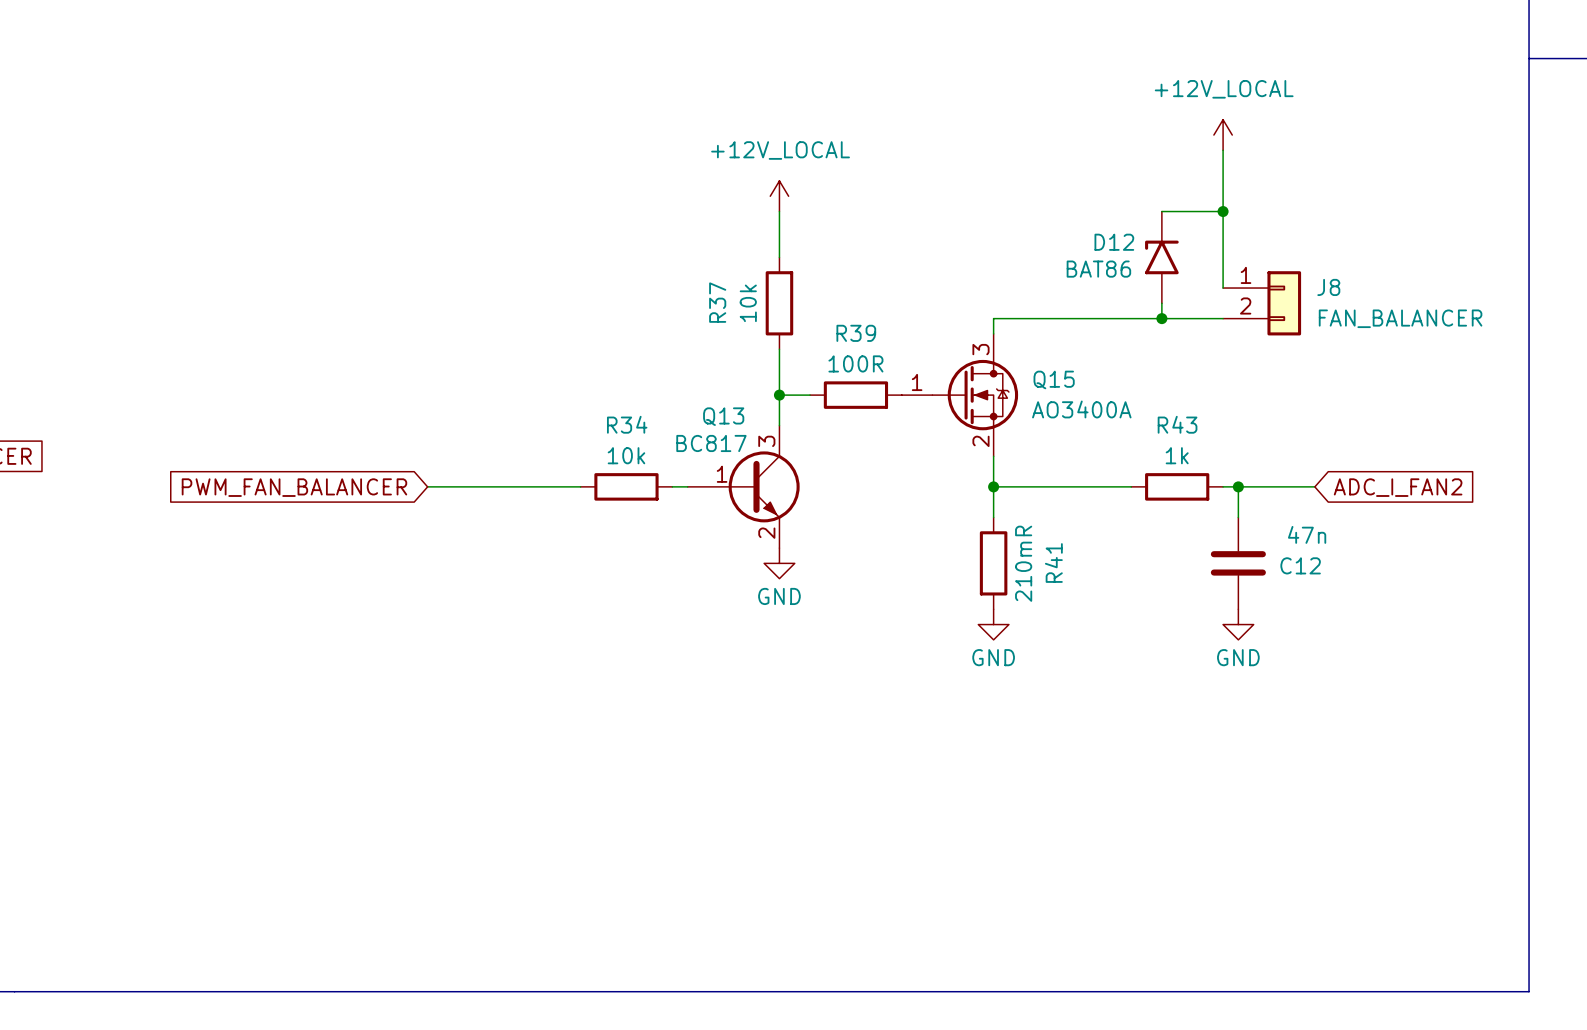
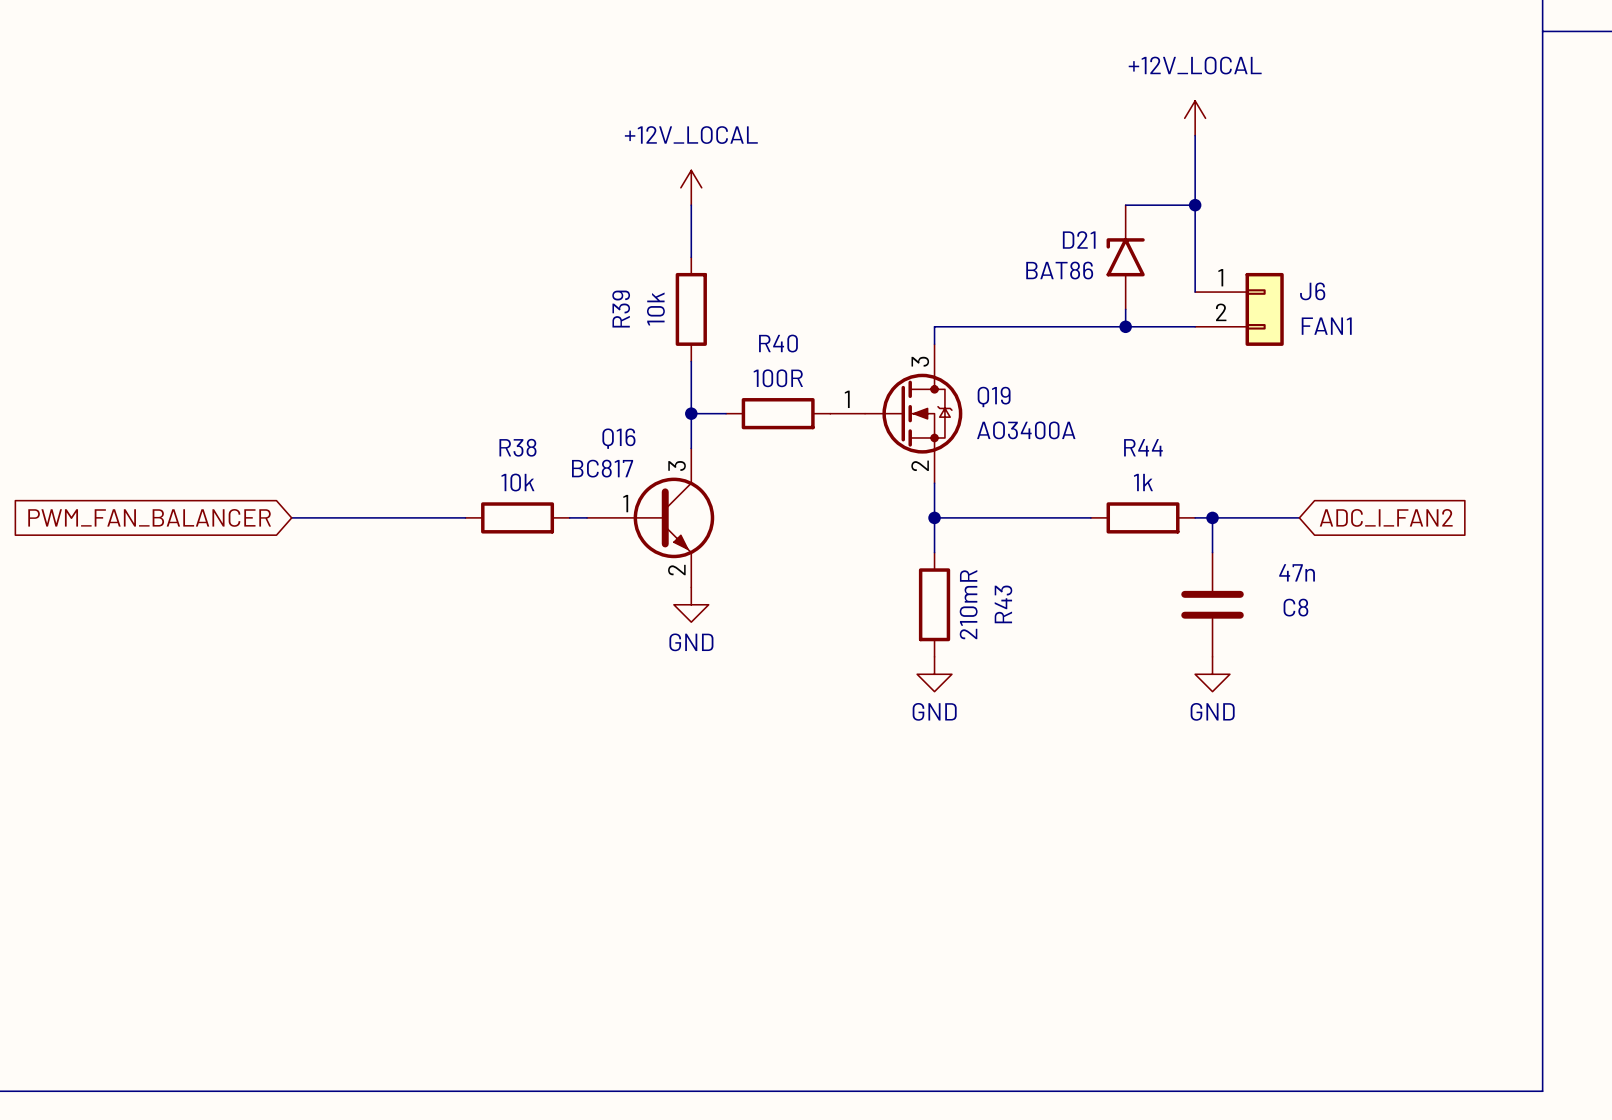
D12 name: D12 (1114, 242) -> D21 (1079, 239)
J8 name: J8 (1328, 287) -> J6 (1312, 291)
R37 name: R37 (717, 302) -> R39 (621, 309)
J8 value: FAN_BALANCER (1400, 318) -> FAN1 (1326, 326)
R39 name: R39 (856, 333) -> R40 (778, 343)
Q15 name: Q15 (1054, 379) -> Q19 (994, 396)
Q13 name: Q13 (723, 416) -> Q16 (618, 438)
R34 name: R34 (627, 424) -> R38 (517, 447)
R43 name: R43 (1177, 424) -> R44 (1143, 447)
R41 name: R41 (1053, 563) -> R43 (1003, 604)
C12 name: C12 (1300, 565) -> C8 (1295, 607)

